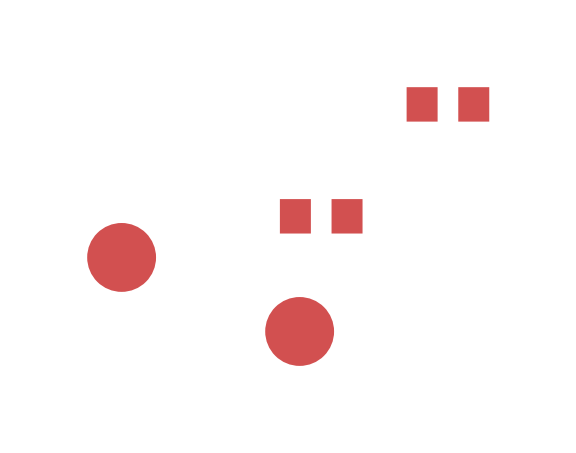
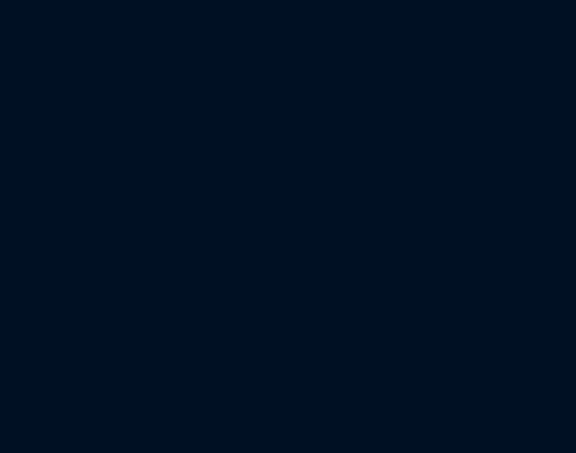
part: (447, 104) -> none
part: (321, 216) -> none
part: (121, 257) -> none
part: (299, 331) -> none

